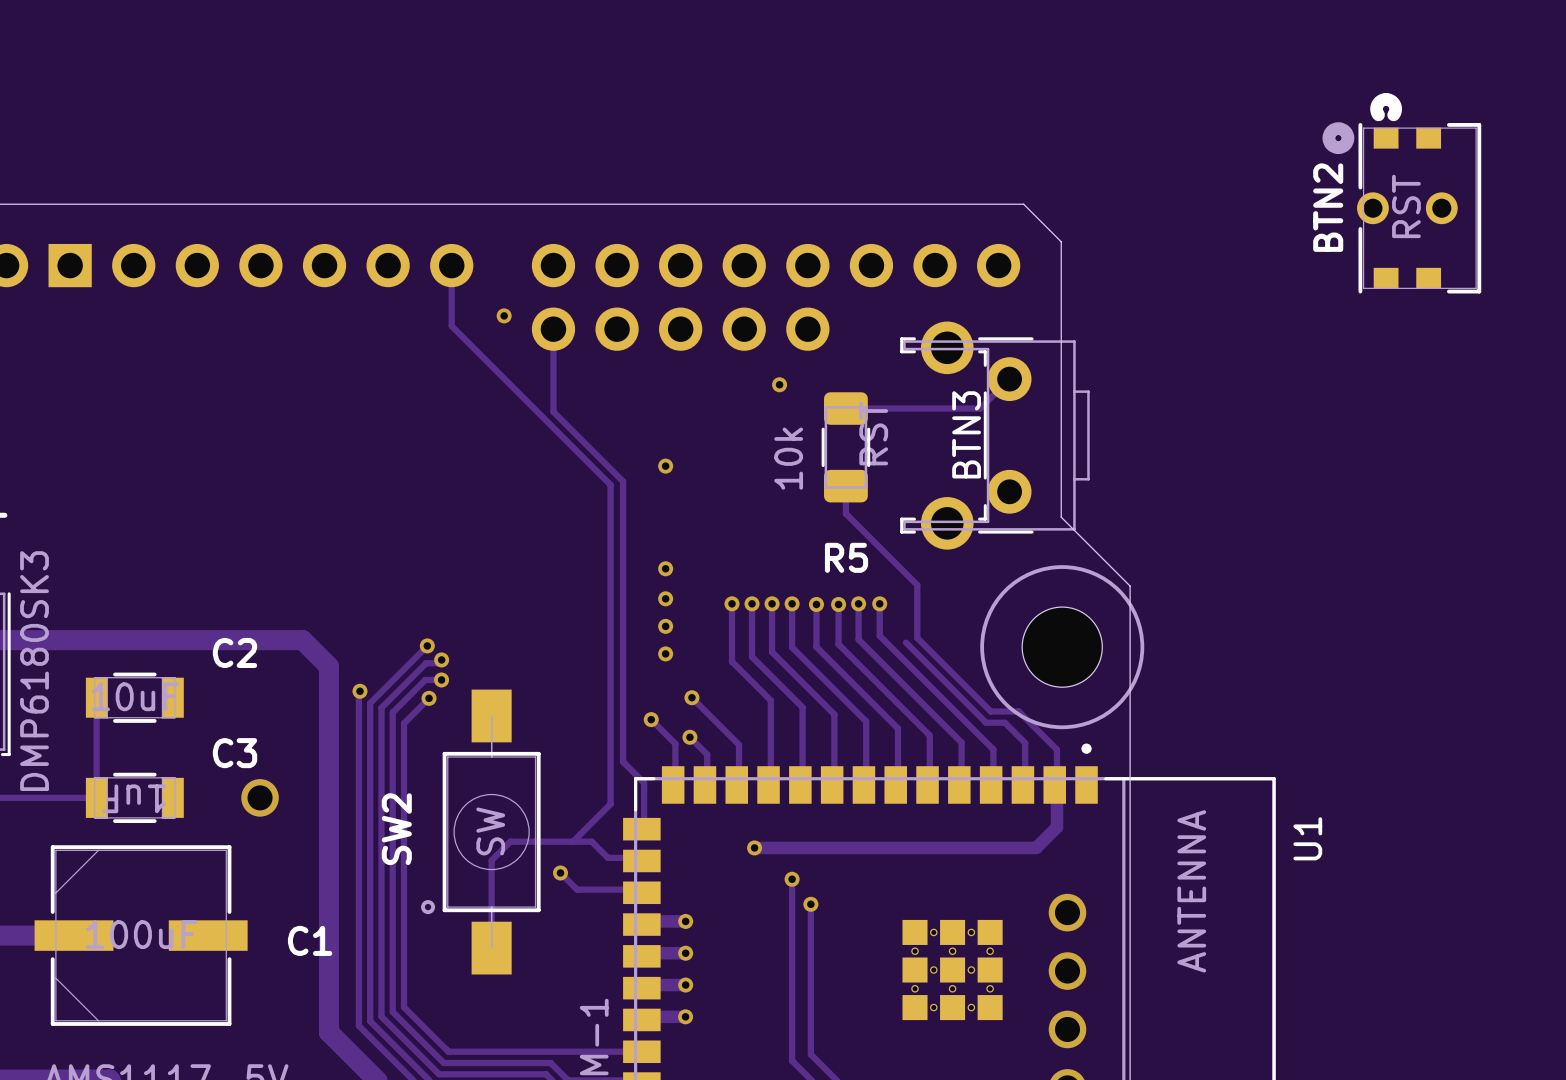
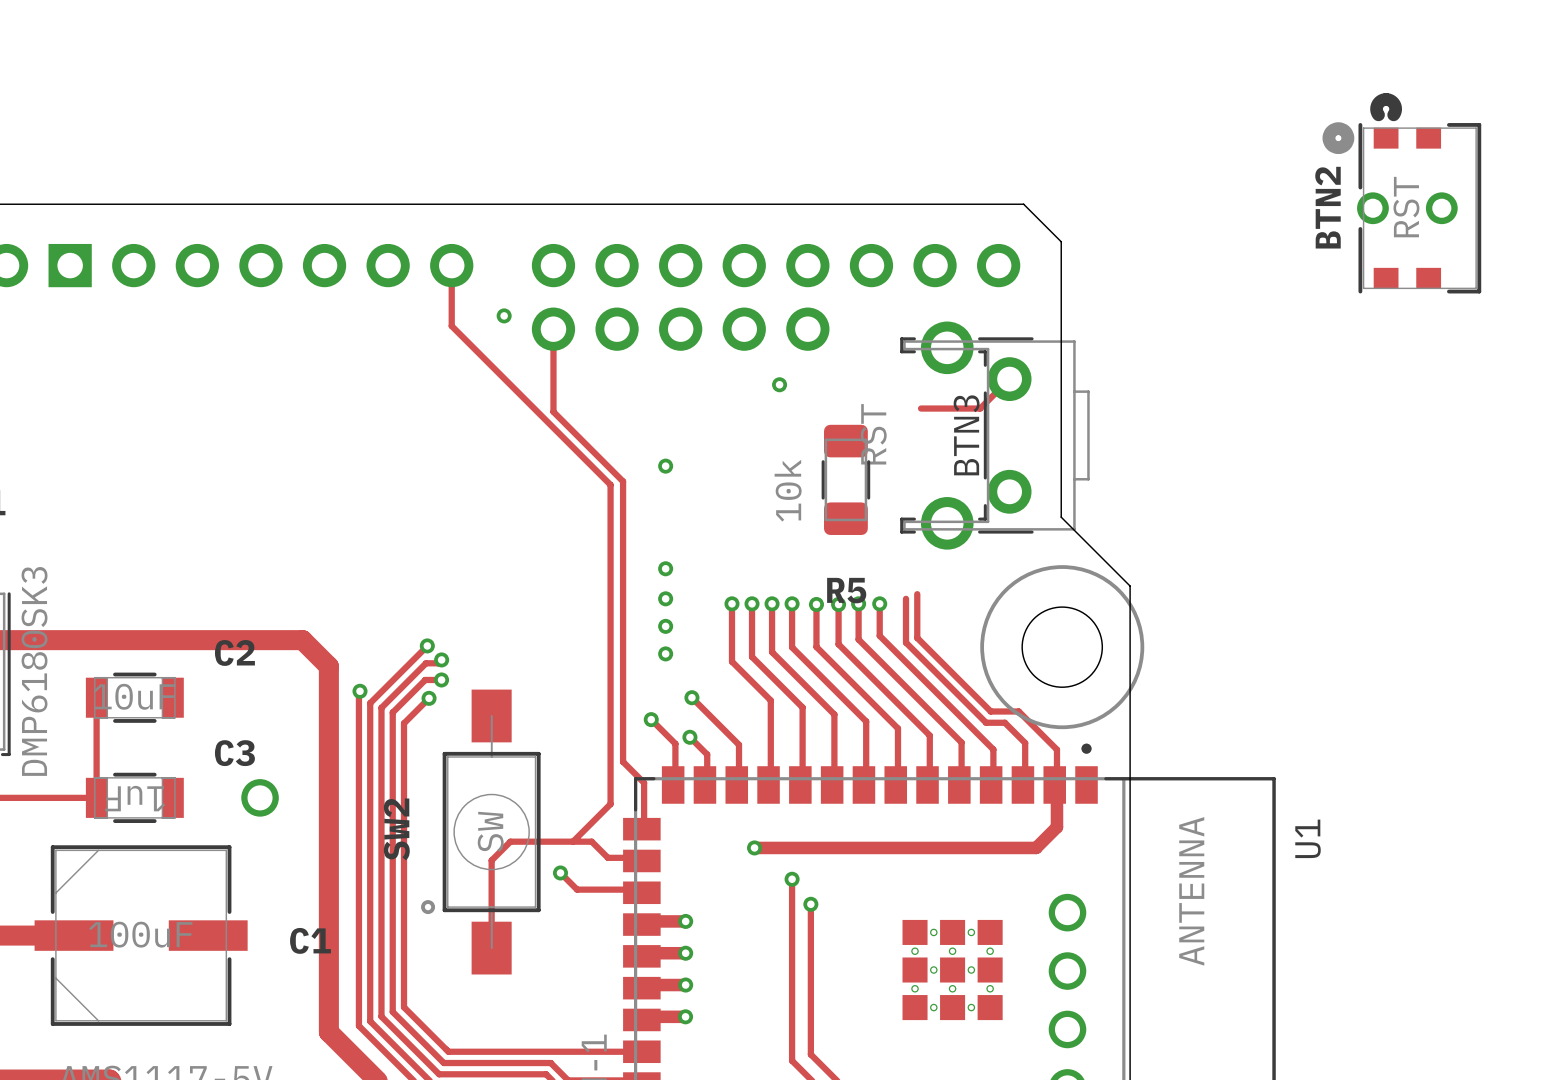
track: (845, 408) (921, 408) -> none
R5 position: (845, 447) -> (845, 479)
track: (845, 486) (845, 513) (917, 585) (917, 594) -> none
track: none -> (906, 598) (906, 642)

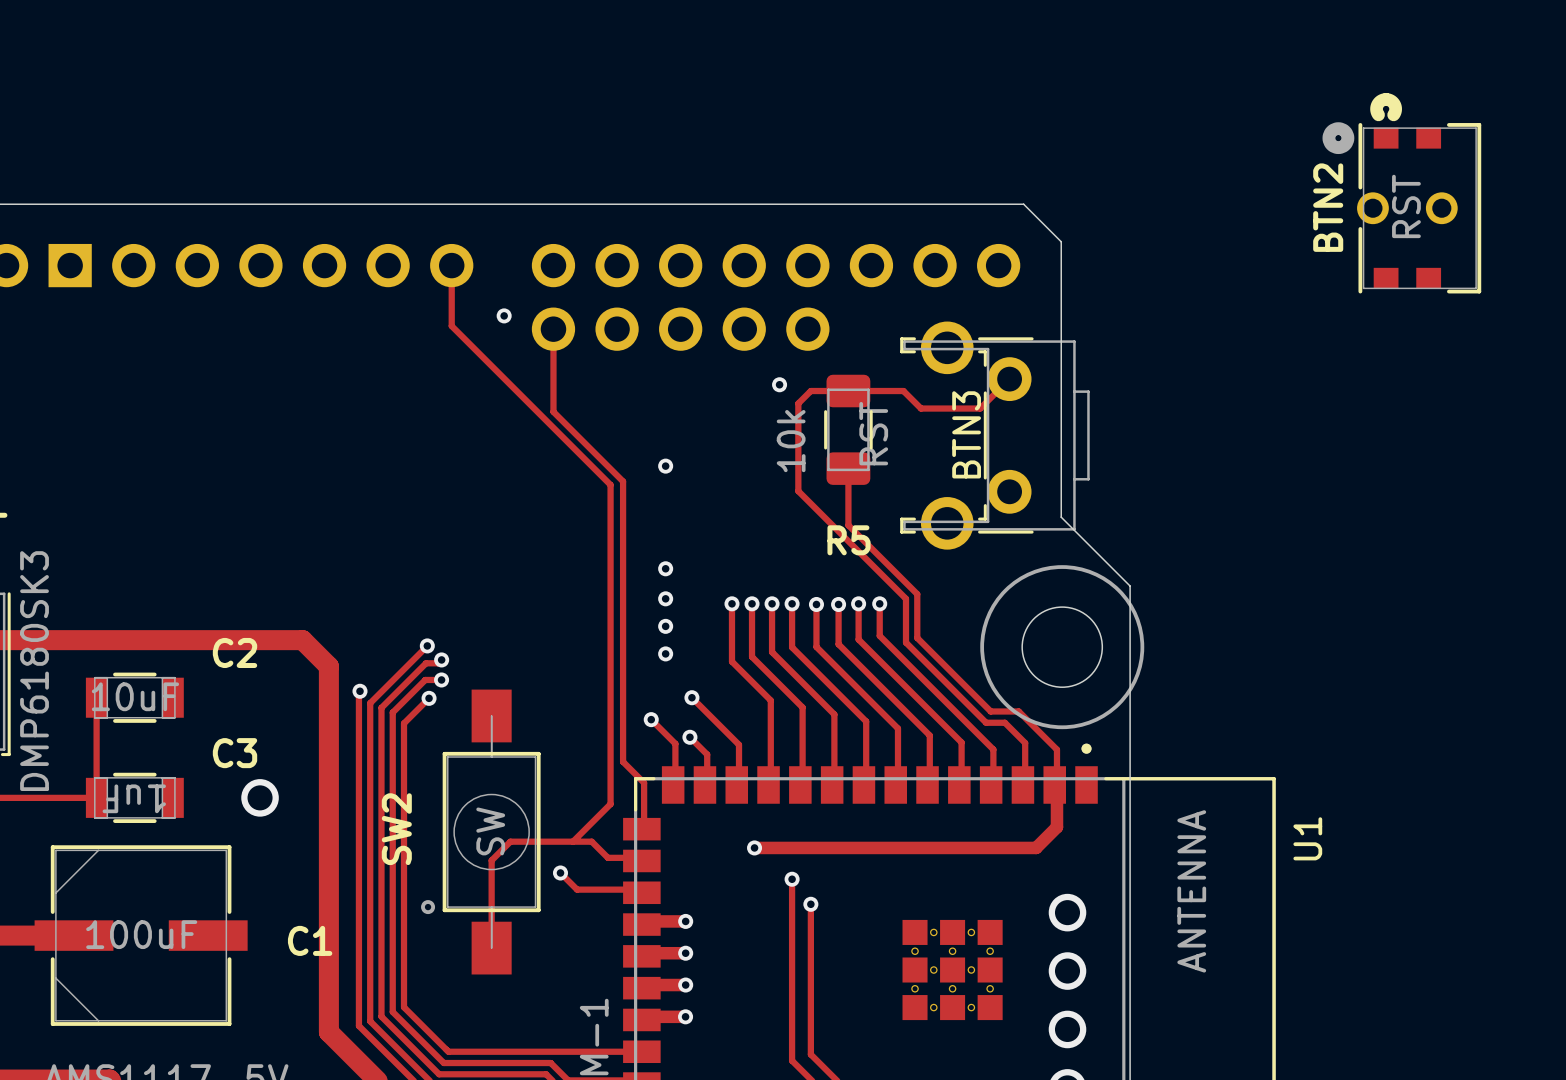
track: none -> (921, 408) (903, 391) (810, 391) (798, 403) (798, 491) (906, 598)
track: none -> (848, 468) (848, 525) (917, 594)
R5 position: (845, 479) -> (848, 429)

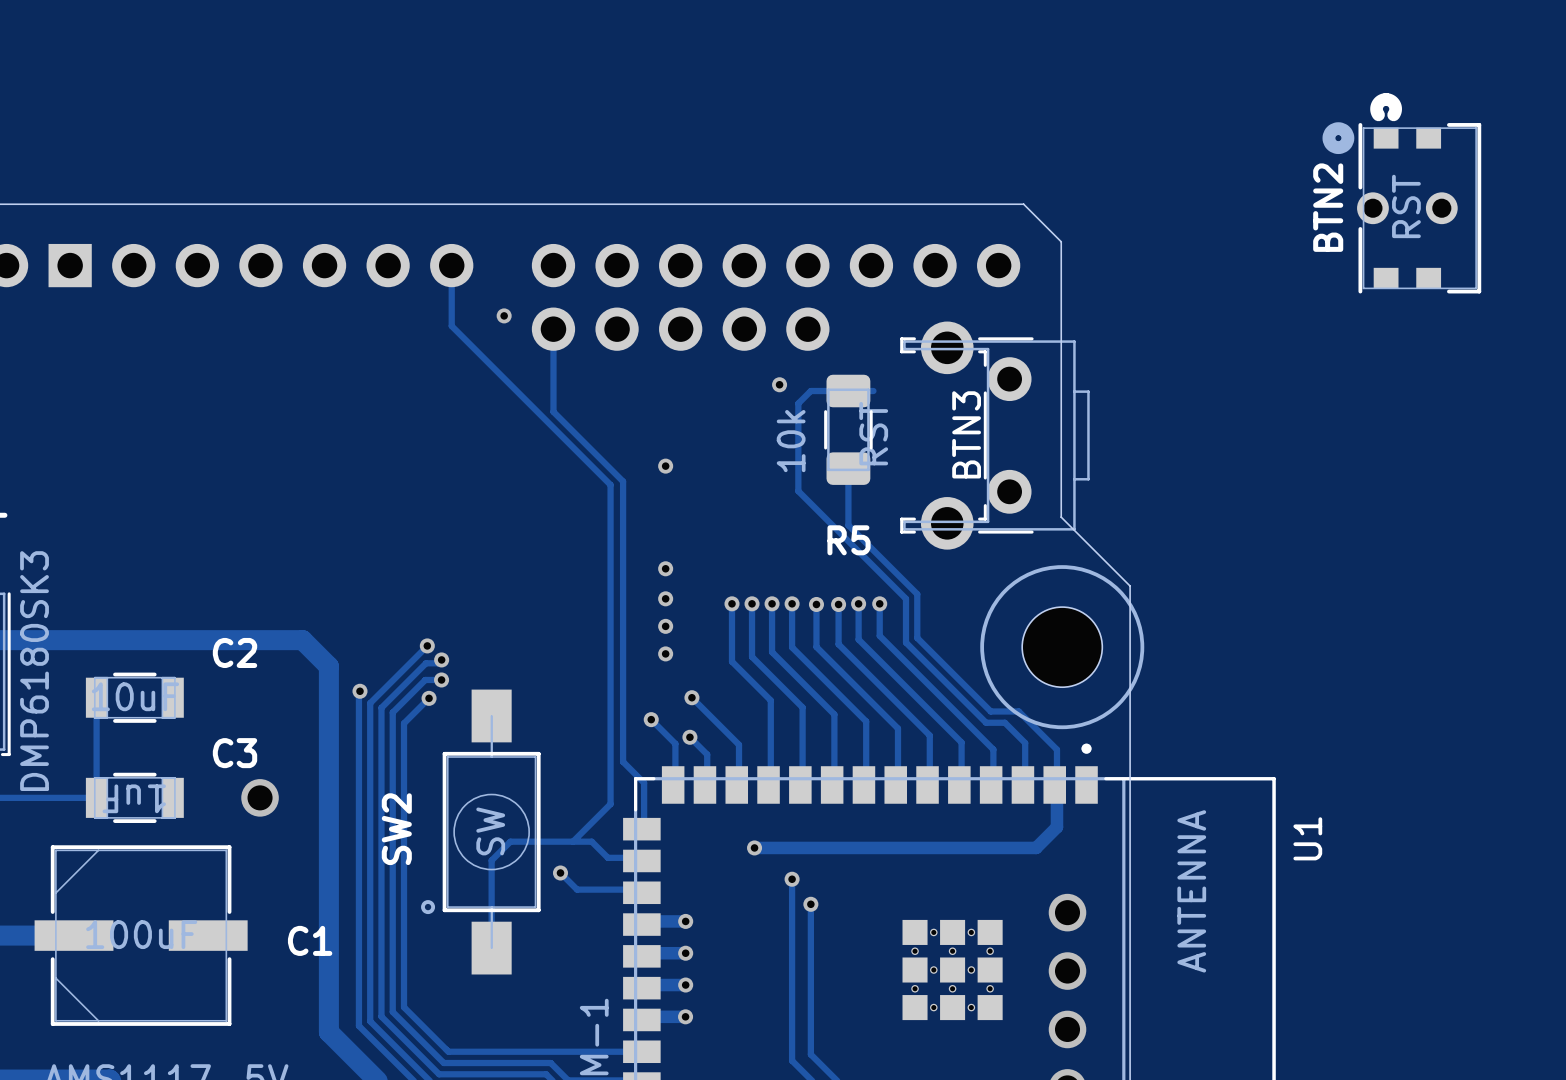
track: (1009, 379) (980, 408) (921, 408) (903, 391) (873, 391) -> none

